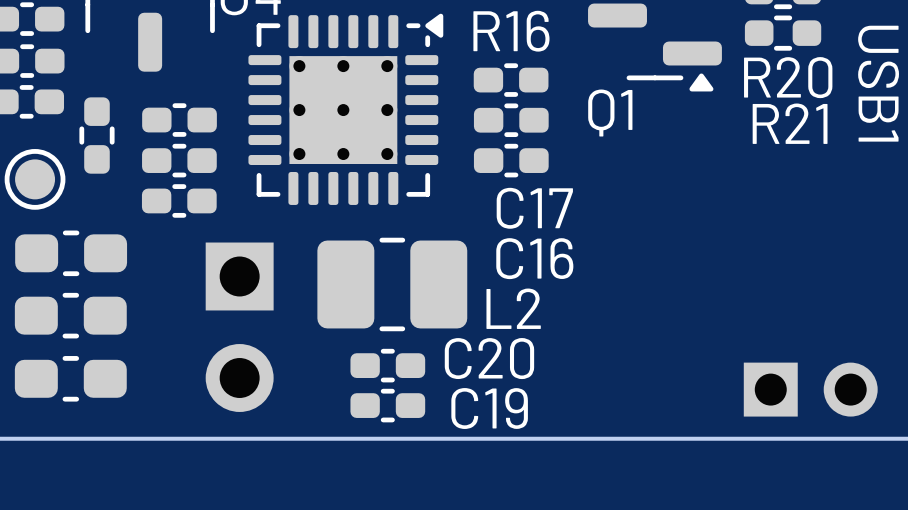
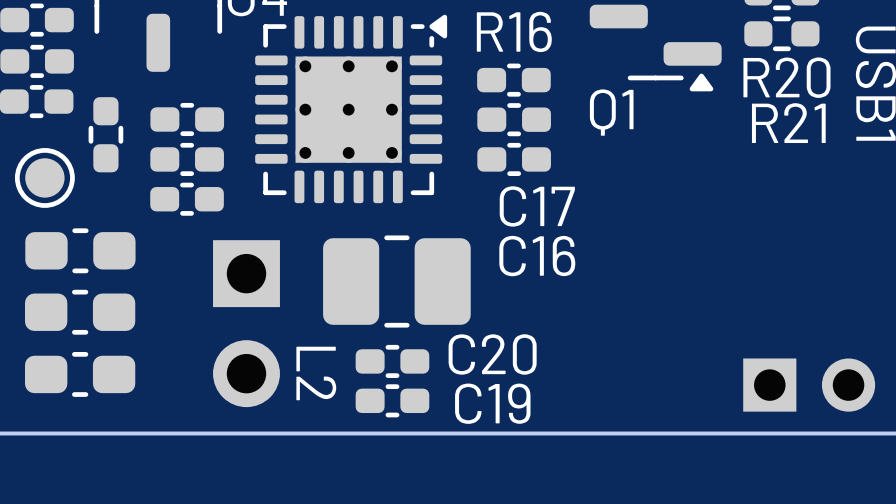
L2 name rotation: 0° (513, 308) -> 90° clockwise (316, 373)
L2 name position: L2 (513, 308) -> L2 (316, 373)

